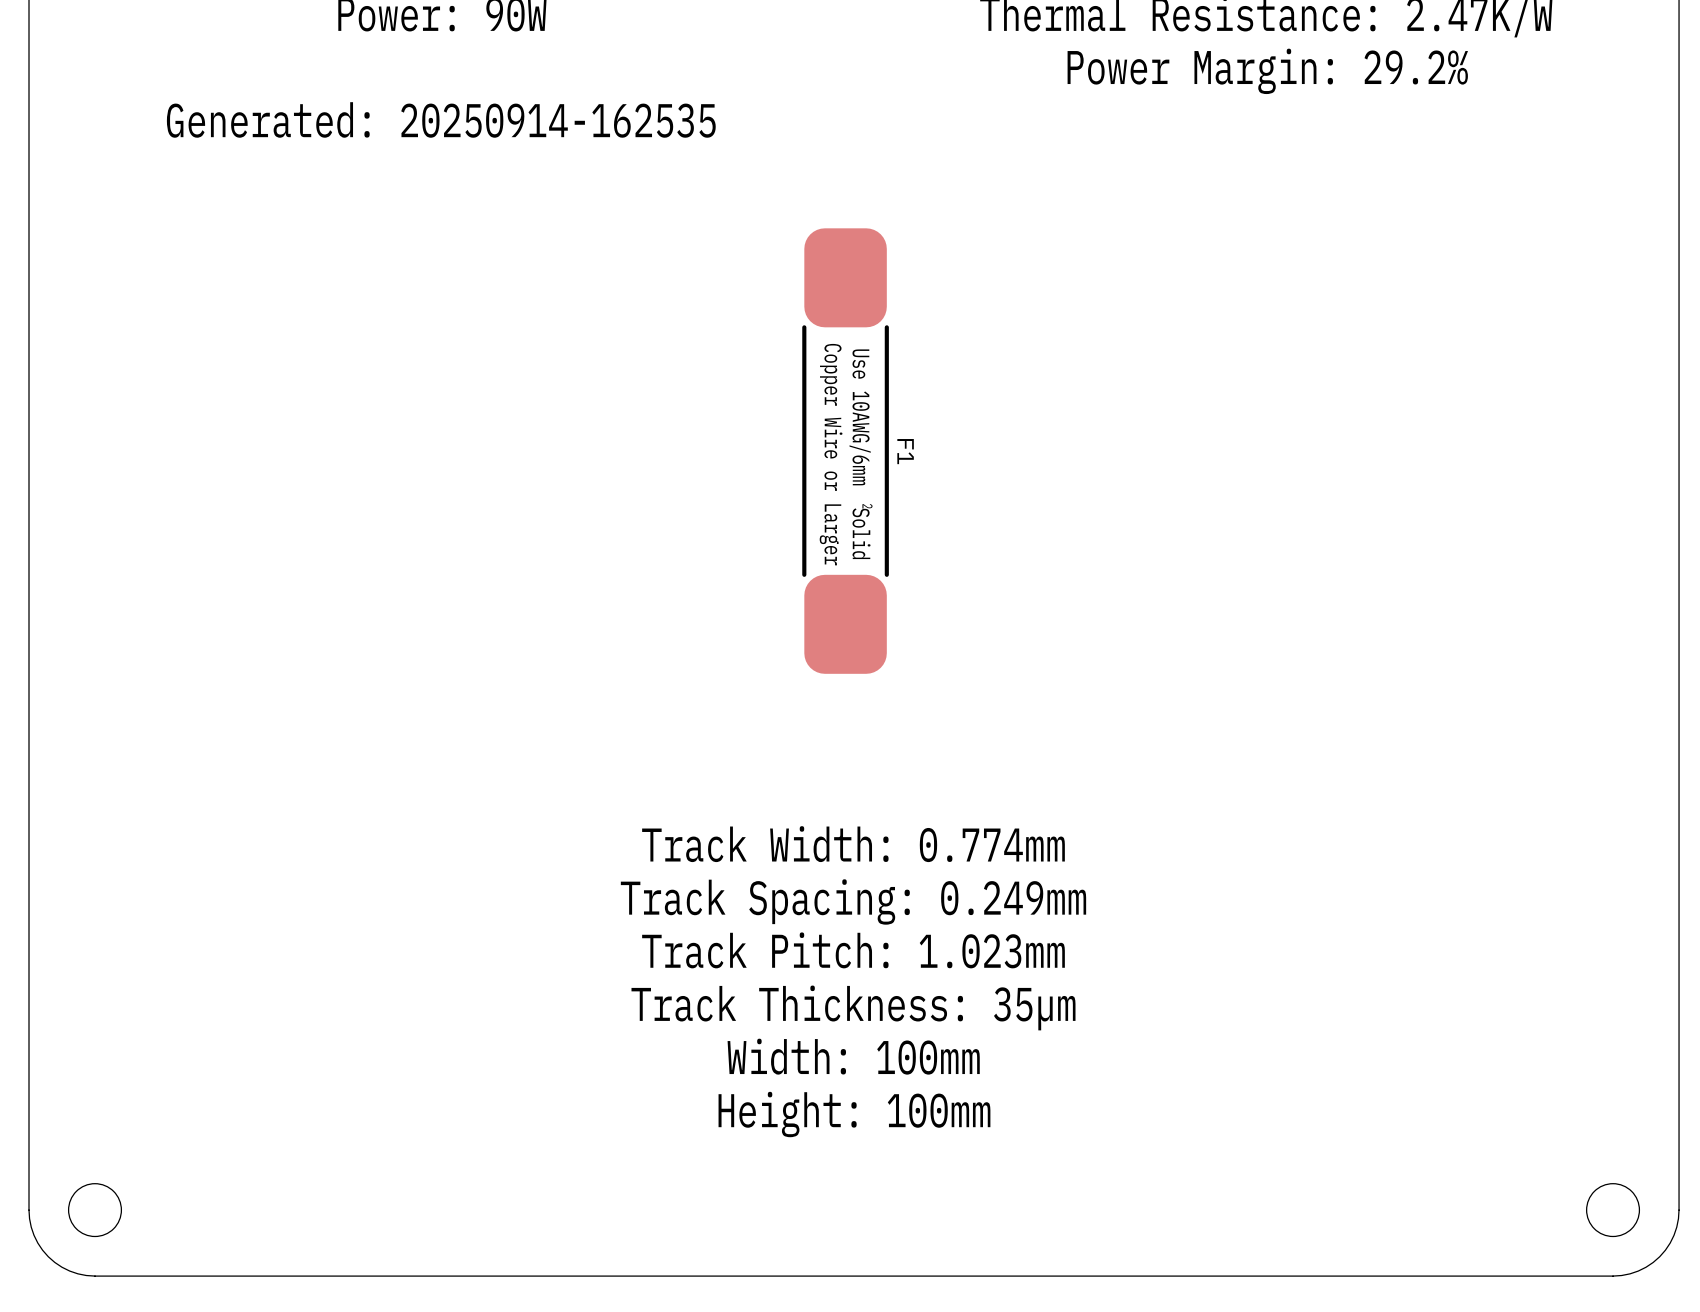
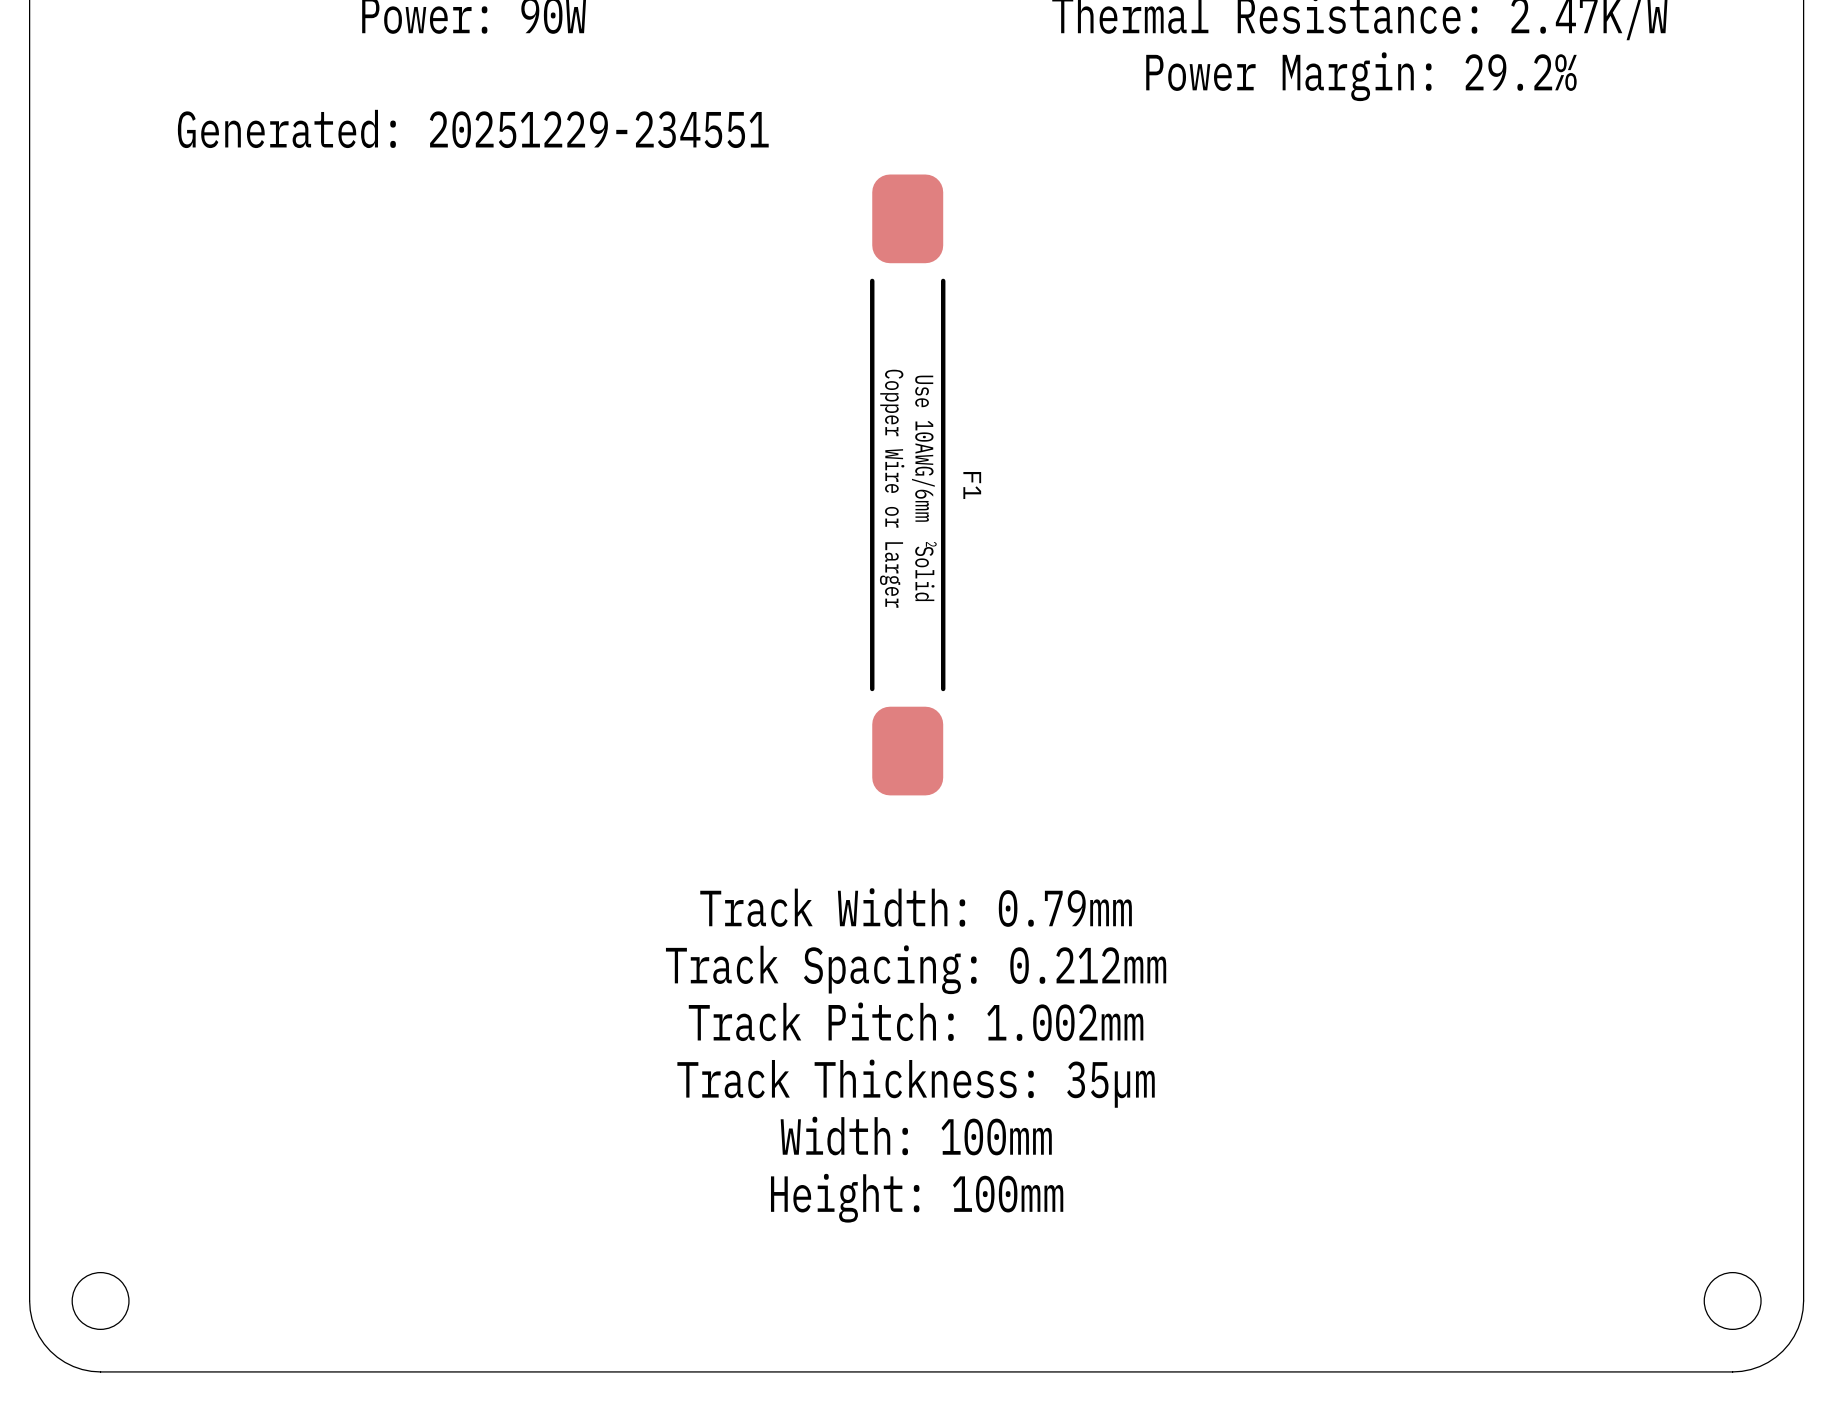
text: Generated: 20250914-162535 (441, 119) -> Generated: 20251229-234551 (473, 128)
F1 footprint: [802, 228, 889, 674] -> [870, 174, 946, 796]
text: Track Width: 0.774mm (853, 844) -> Track Width: 0.79mm (916, 907)
text: Track Spacing: 0.249mm (853, 901) -> Track Spacing: 0.212mm (916, 969)
text: Track Pitch: 1.023mm (853, 950) -> Track Pitch: 1.002mm (916, 1021)

